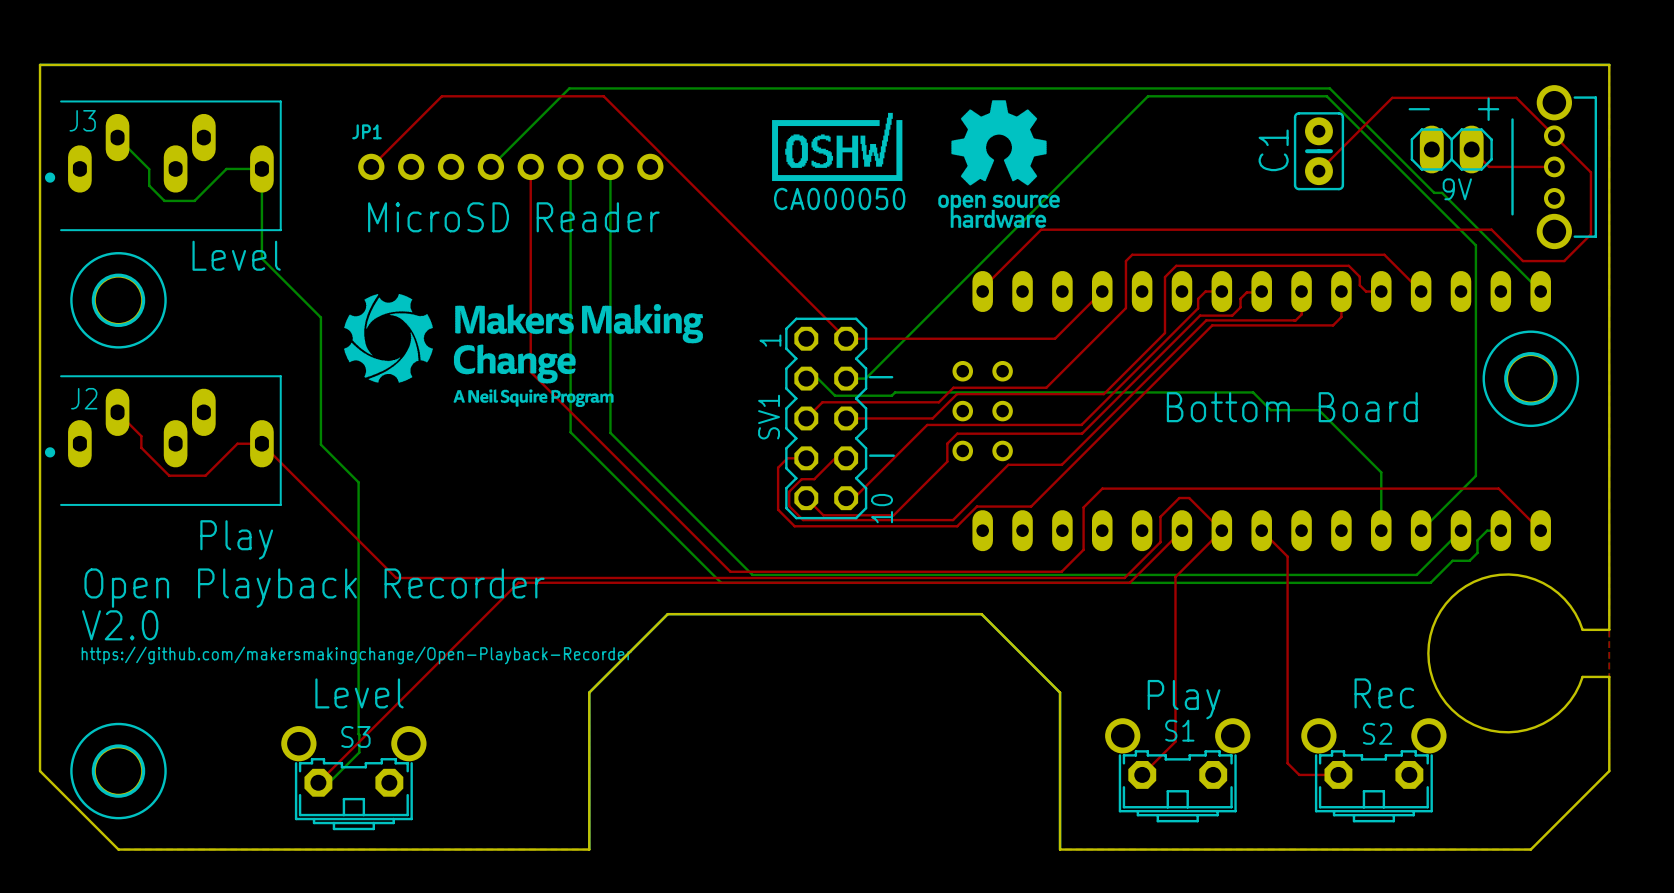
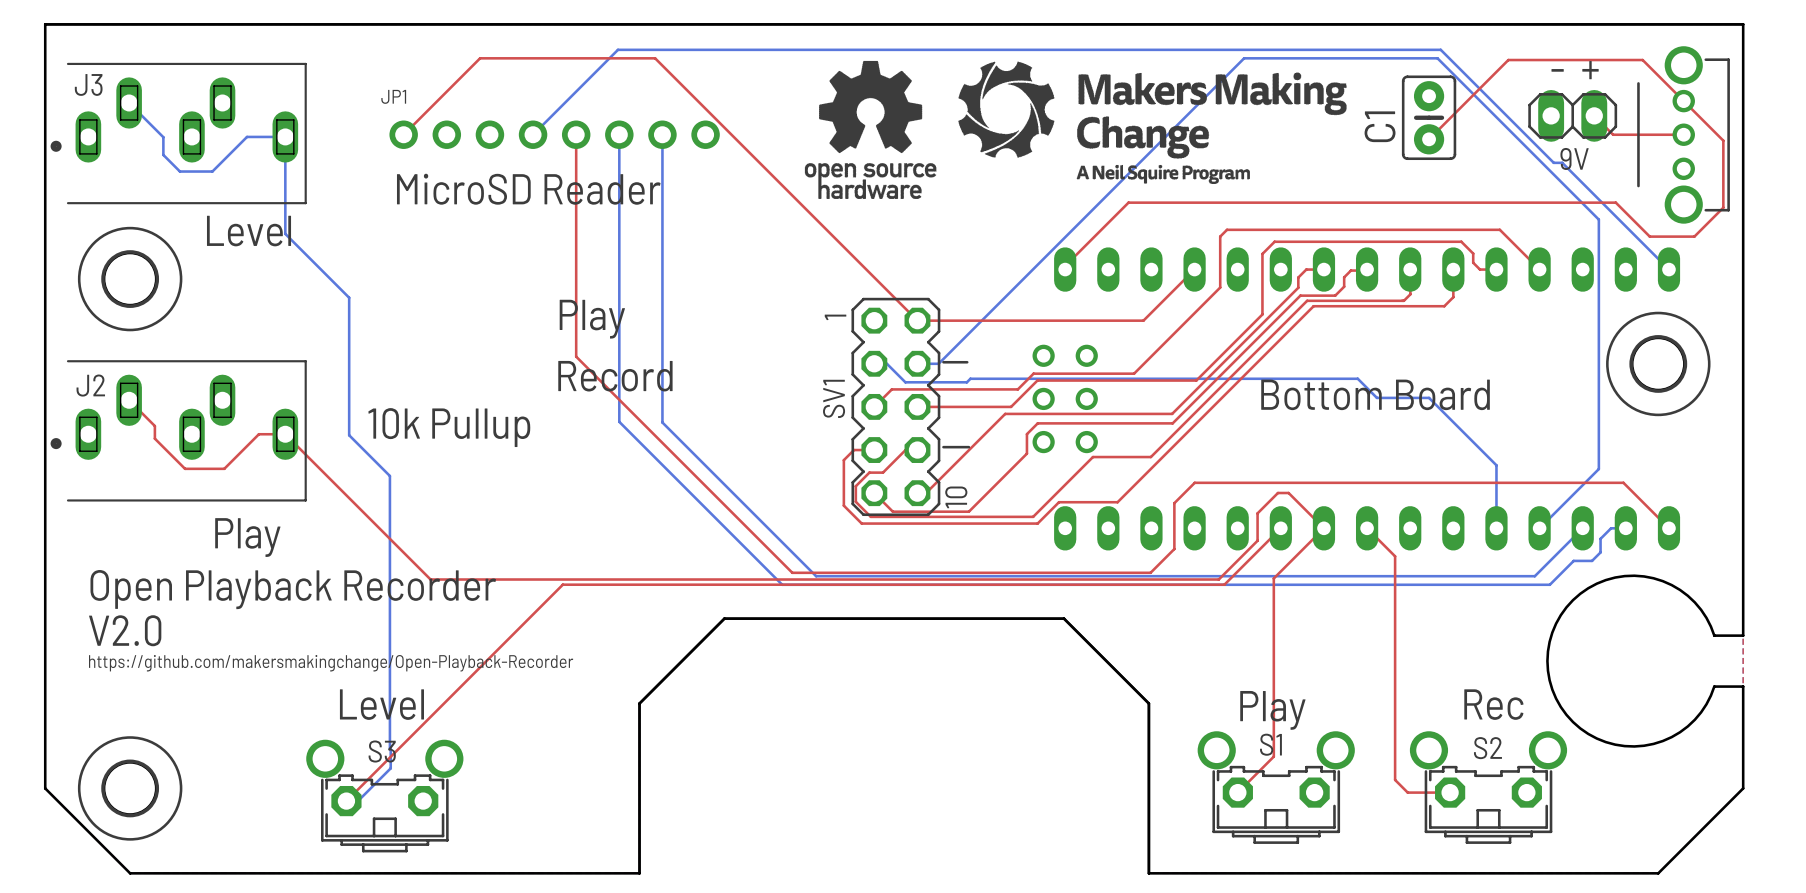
drawing: none -> [958, 61, 1347, 184]
drawing: [772, 112, 903, 182] -> none
drawing position: (999, 164) -> (870, 129)
drawing: [344, 294, 703, 408] -> none
text: none -> Play (592, 319)
text: none -> Record (615, 376)
text: none -> 10k Pullup (449, 427)

